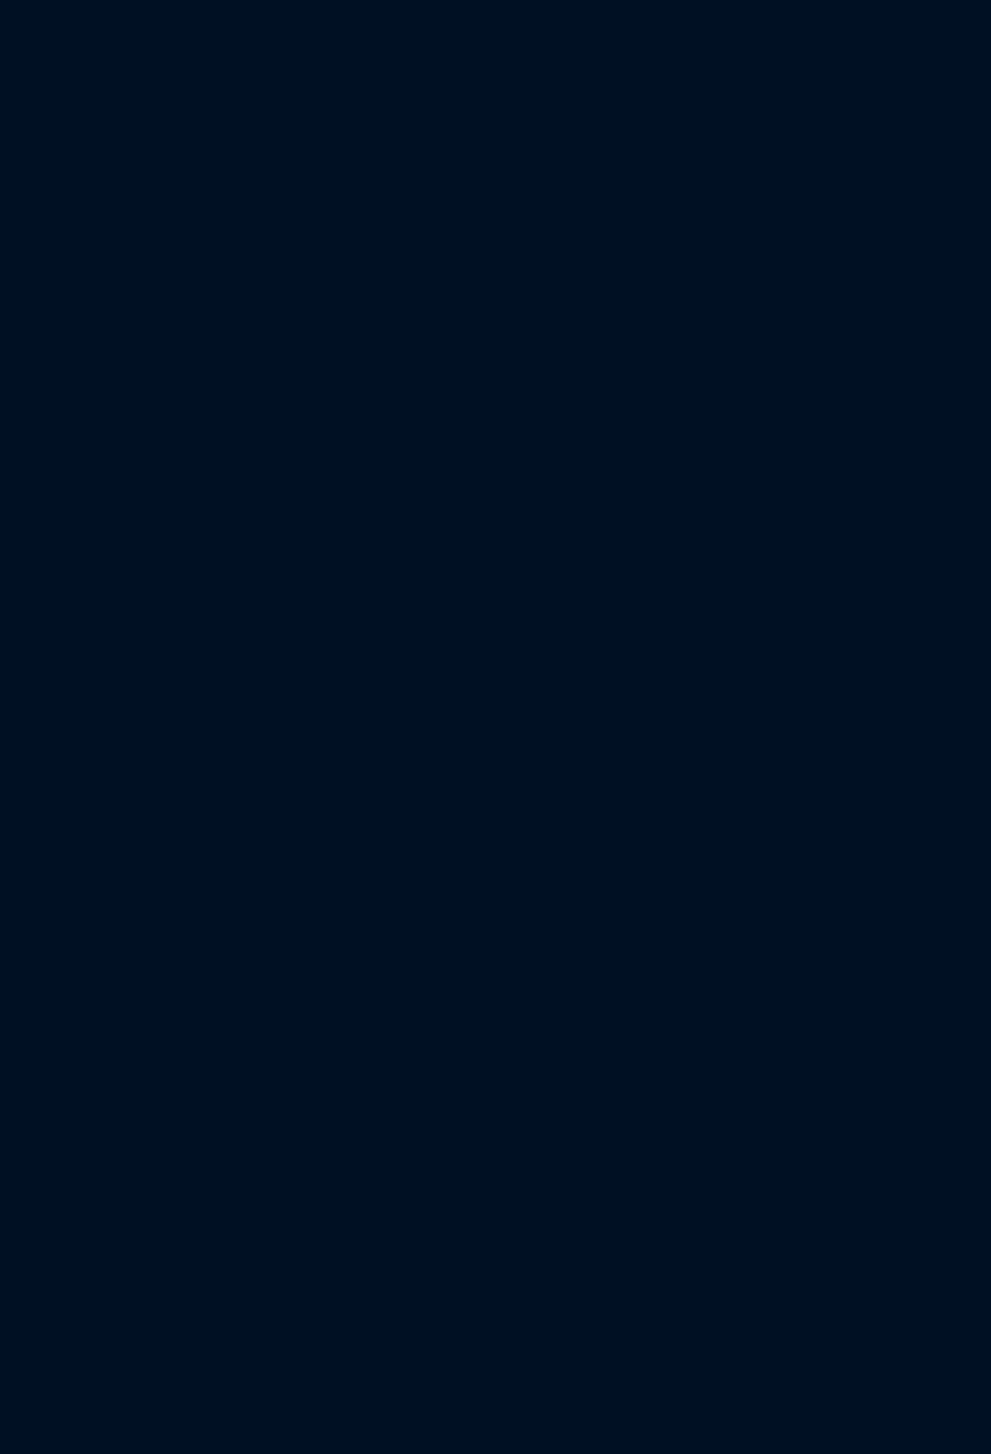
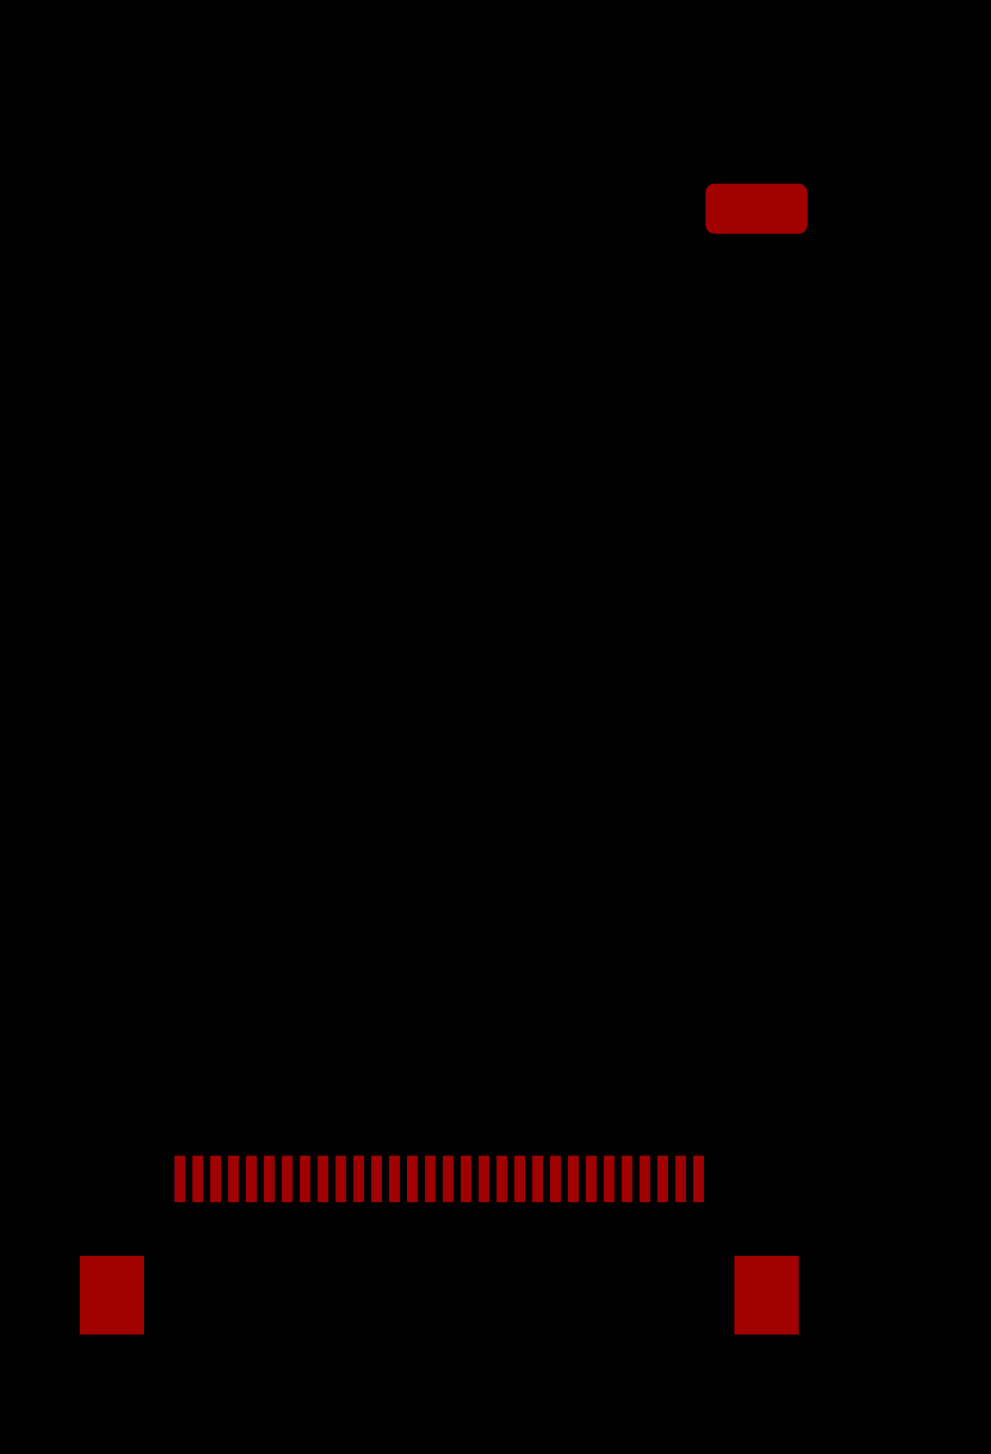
part: none -> (756, 208)
part: none -> (439, 1245)

